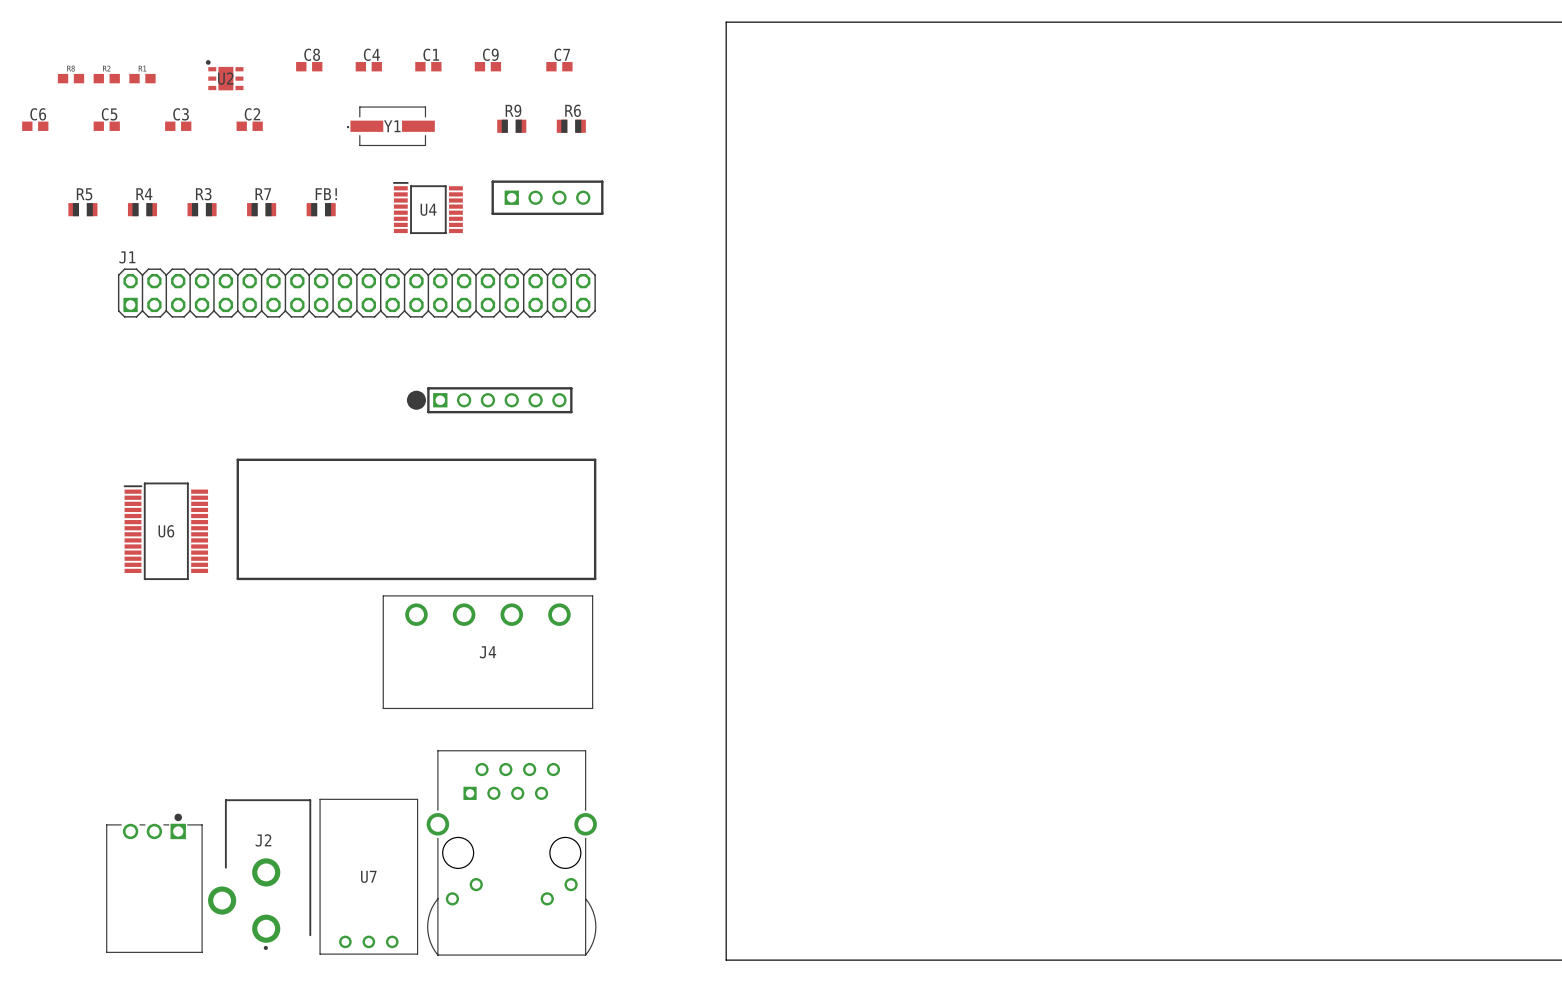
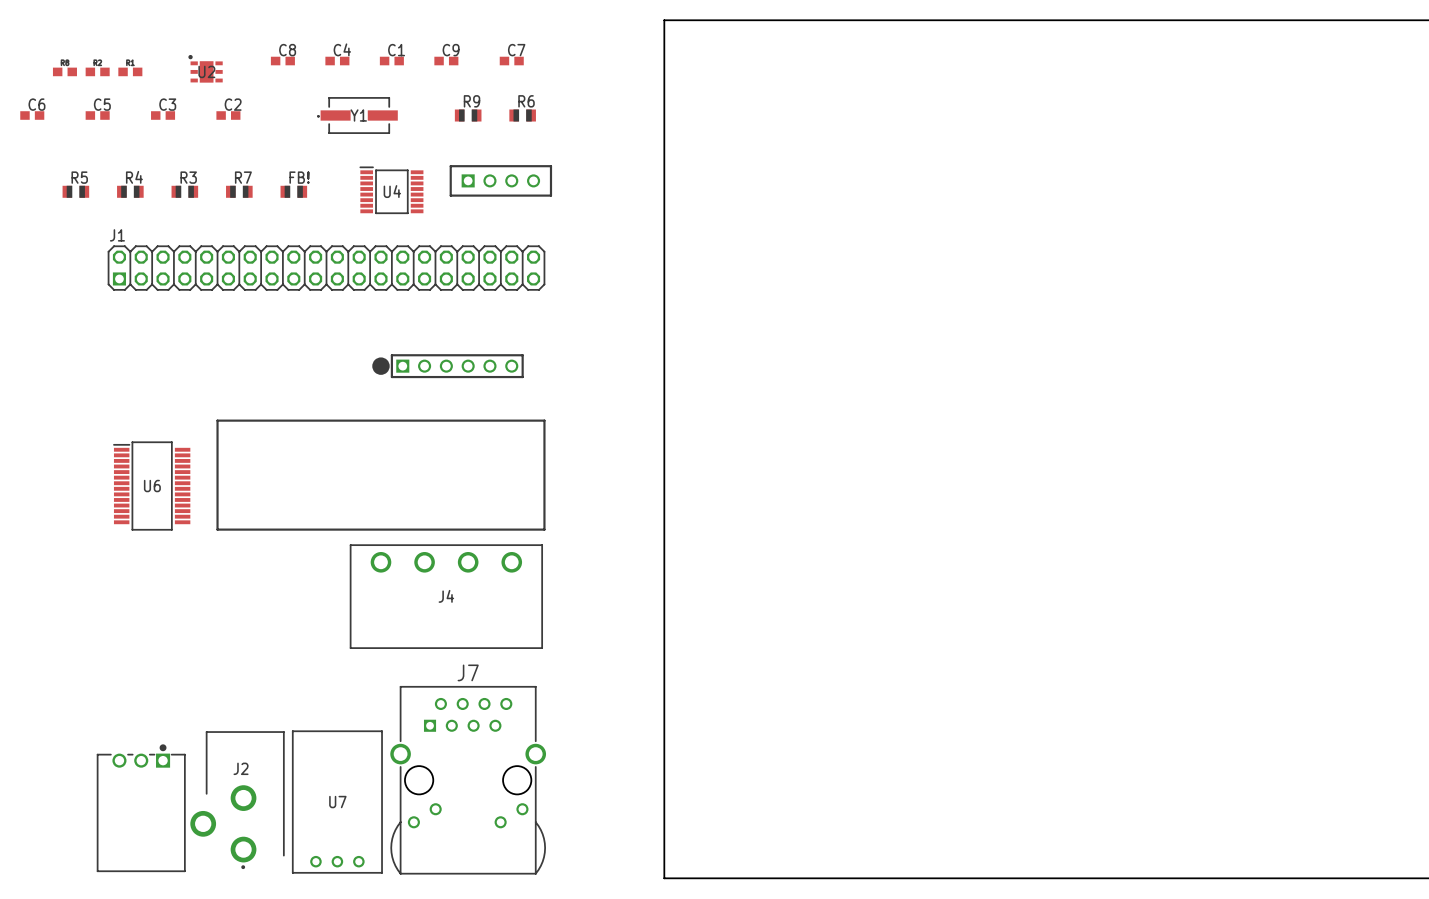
J7 name: none -> J7 (468, 672)

